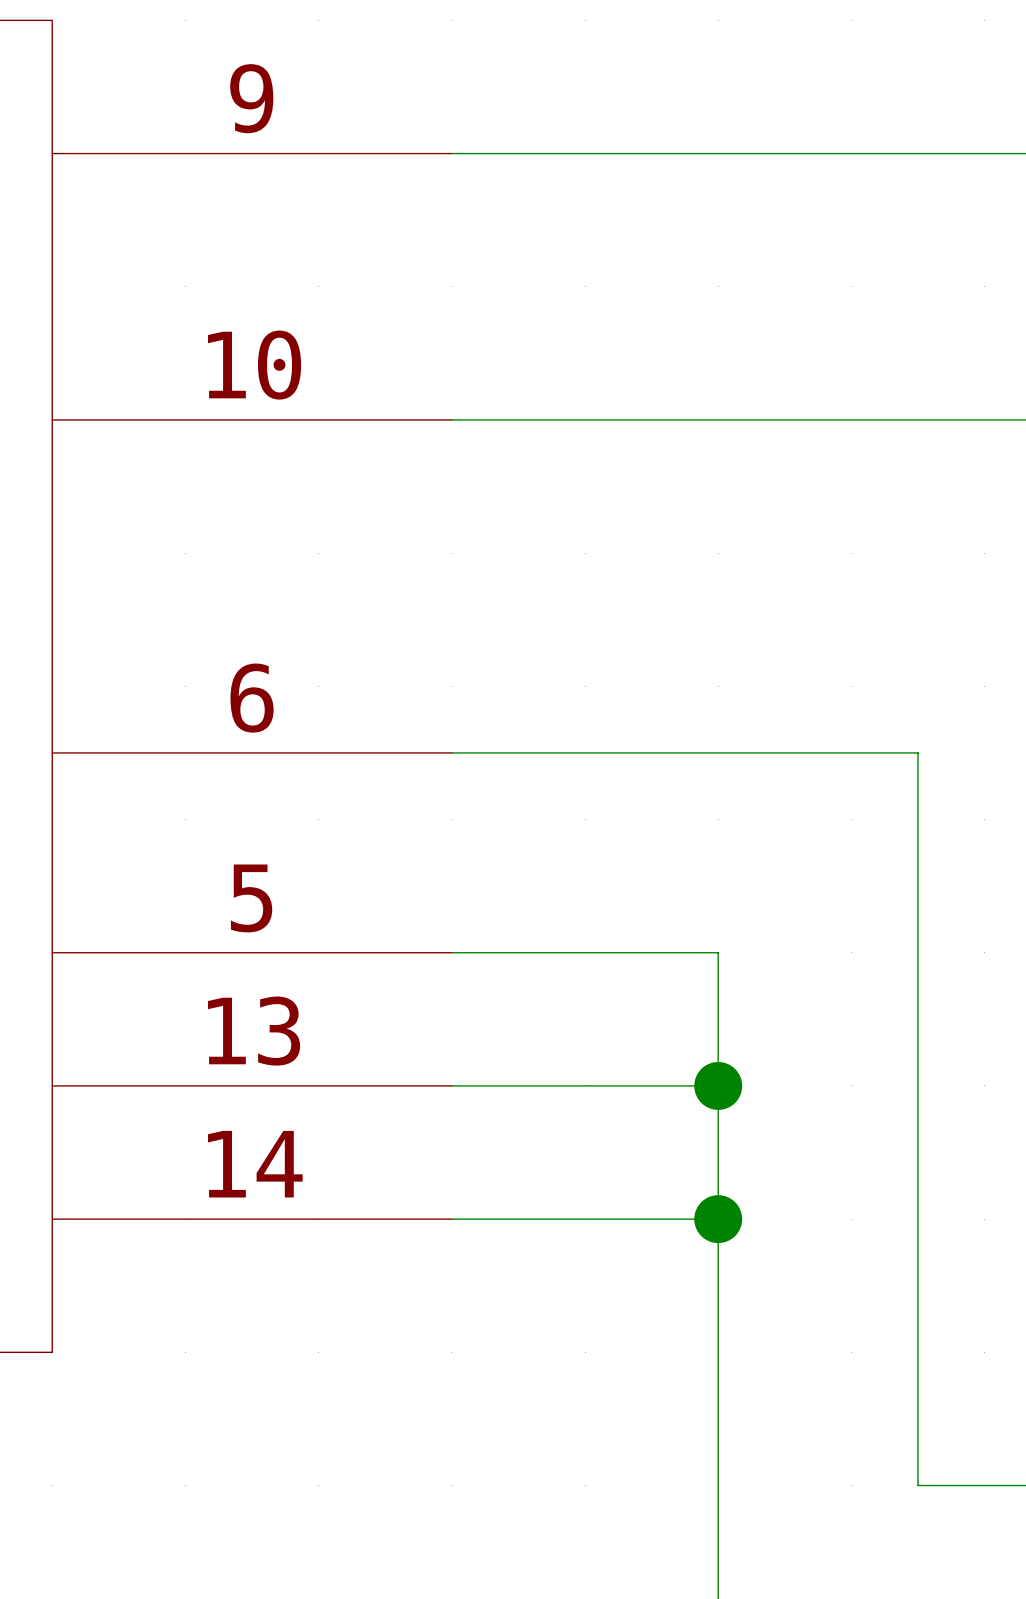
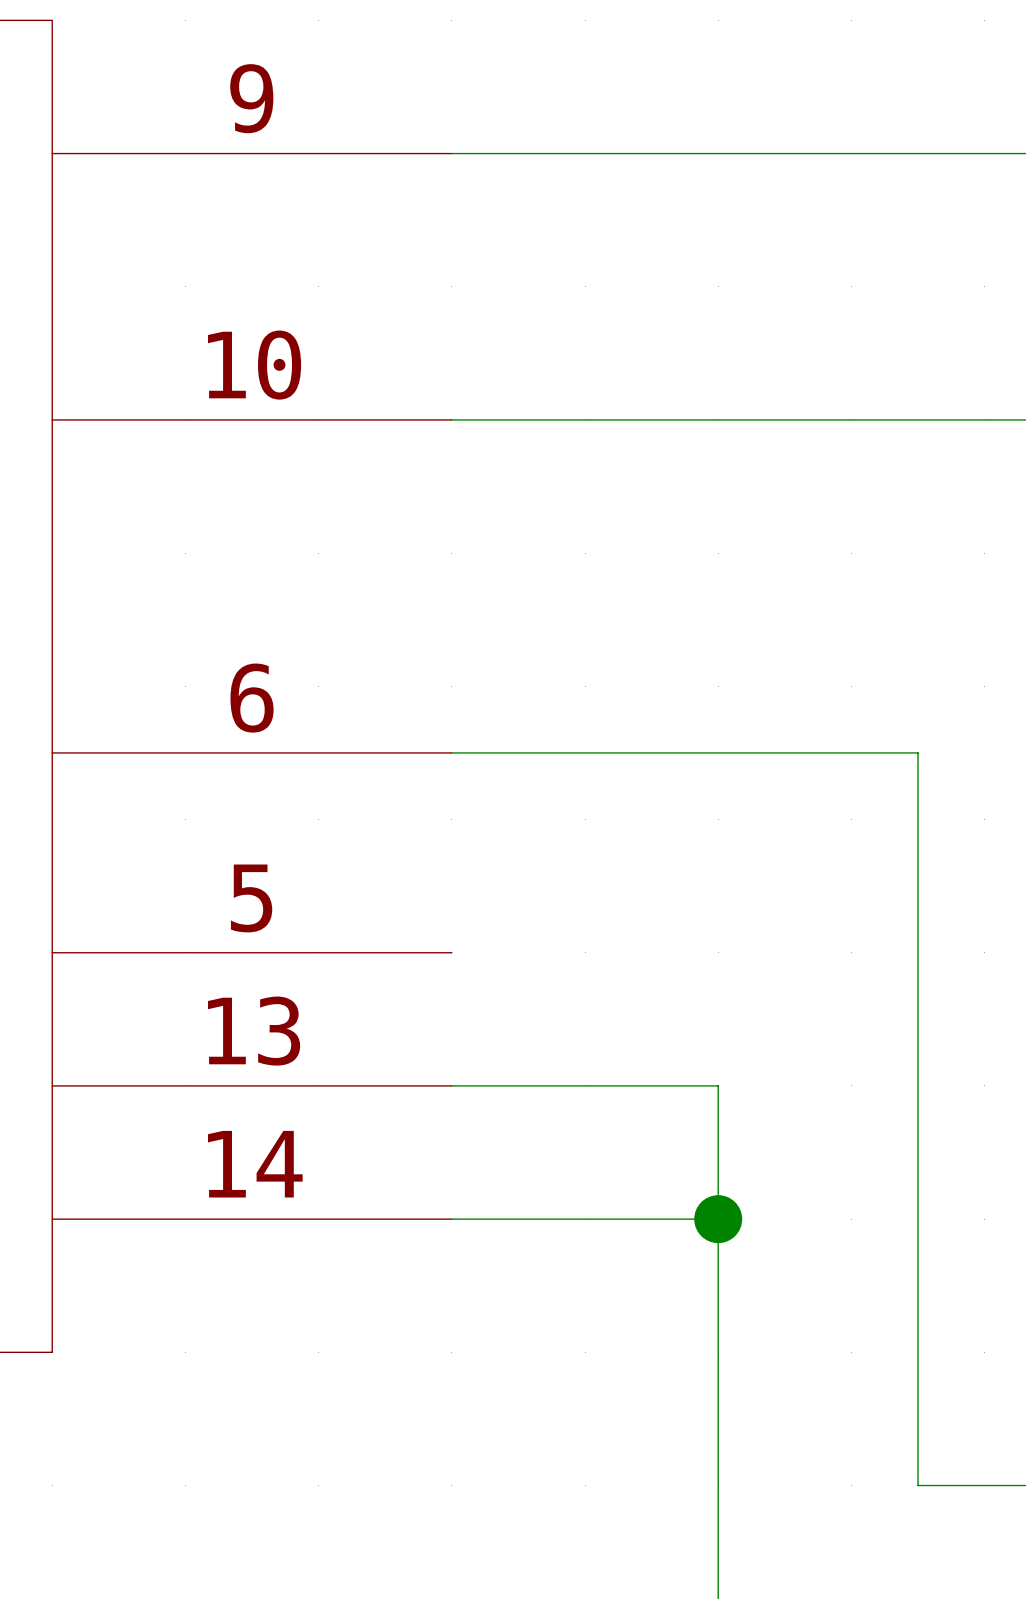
wire: (451, 952) (718, 952) (718, 1085) -> none
junction: (718, 1085) -> none

